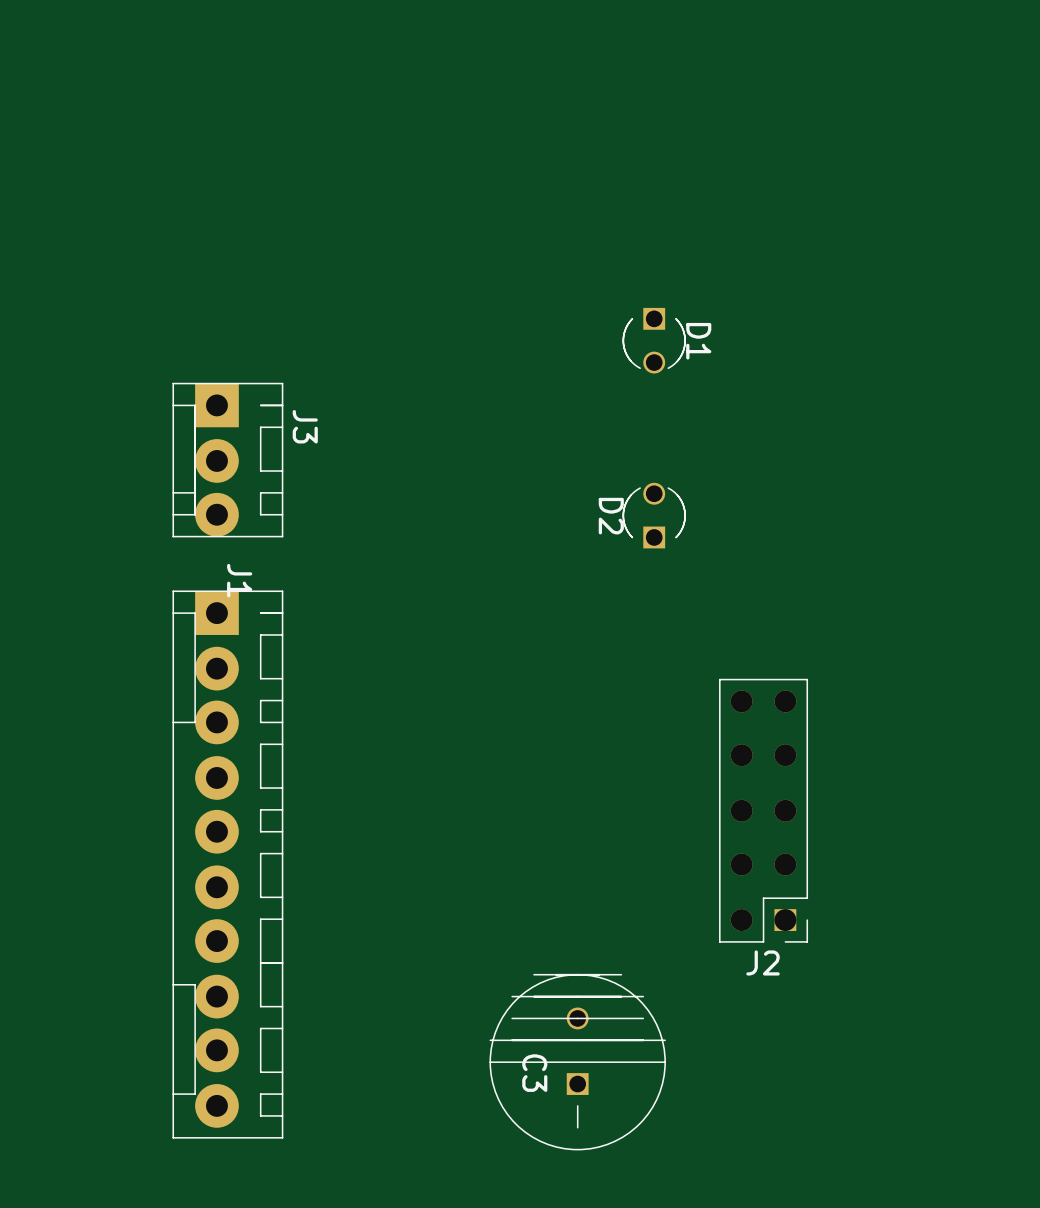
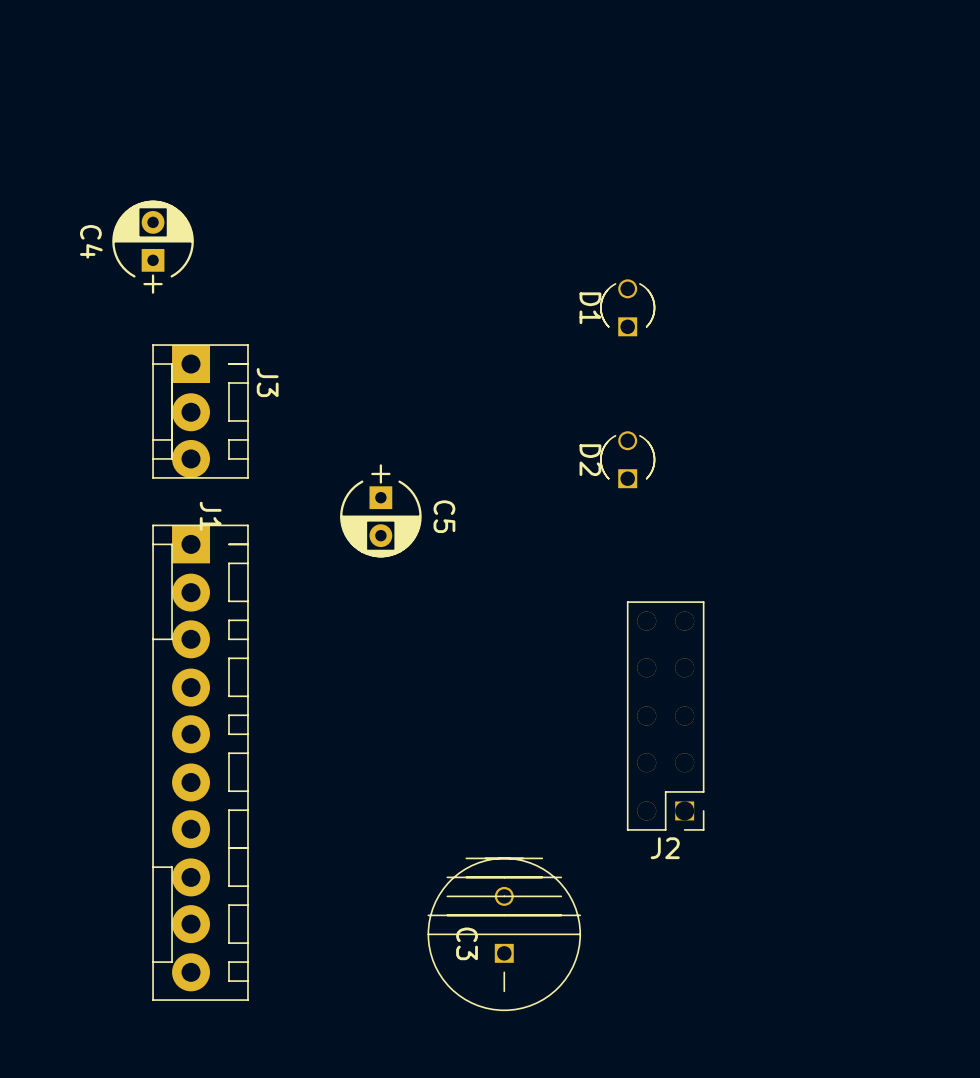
C4: none -> (153, 247)
D1 rotation: 0° (654, 340) -> 180° (627, 307)
D1 position: (654, 340) -> (627, 307)
D2 position: (654, 515) -> (627, 459)
C5: none -> (380, 510)

